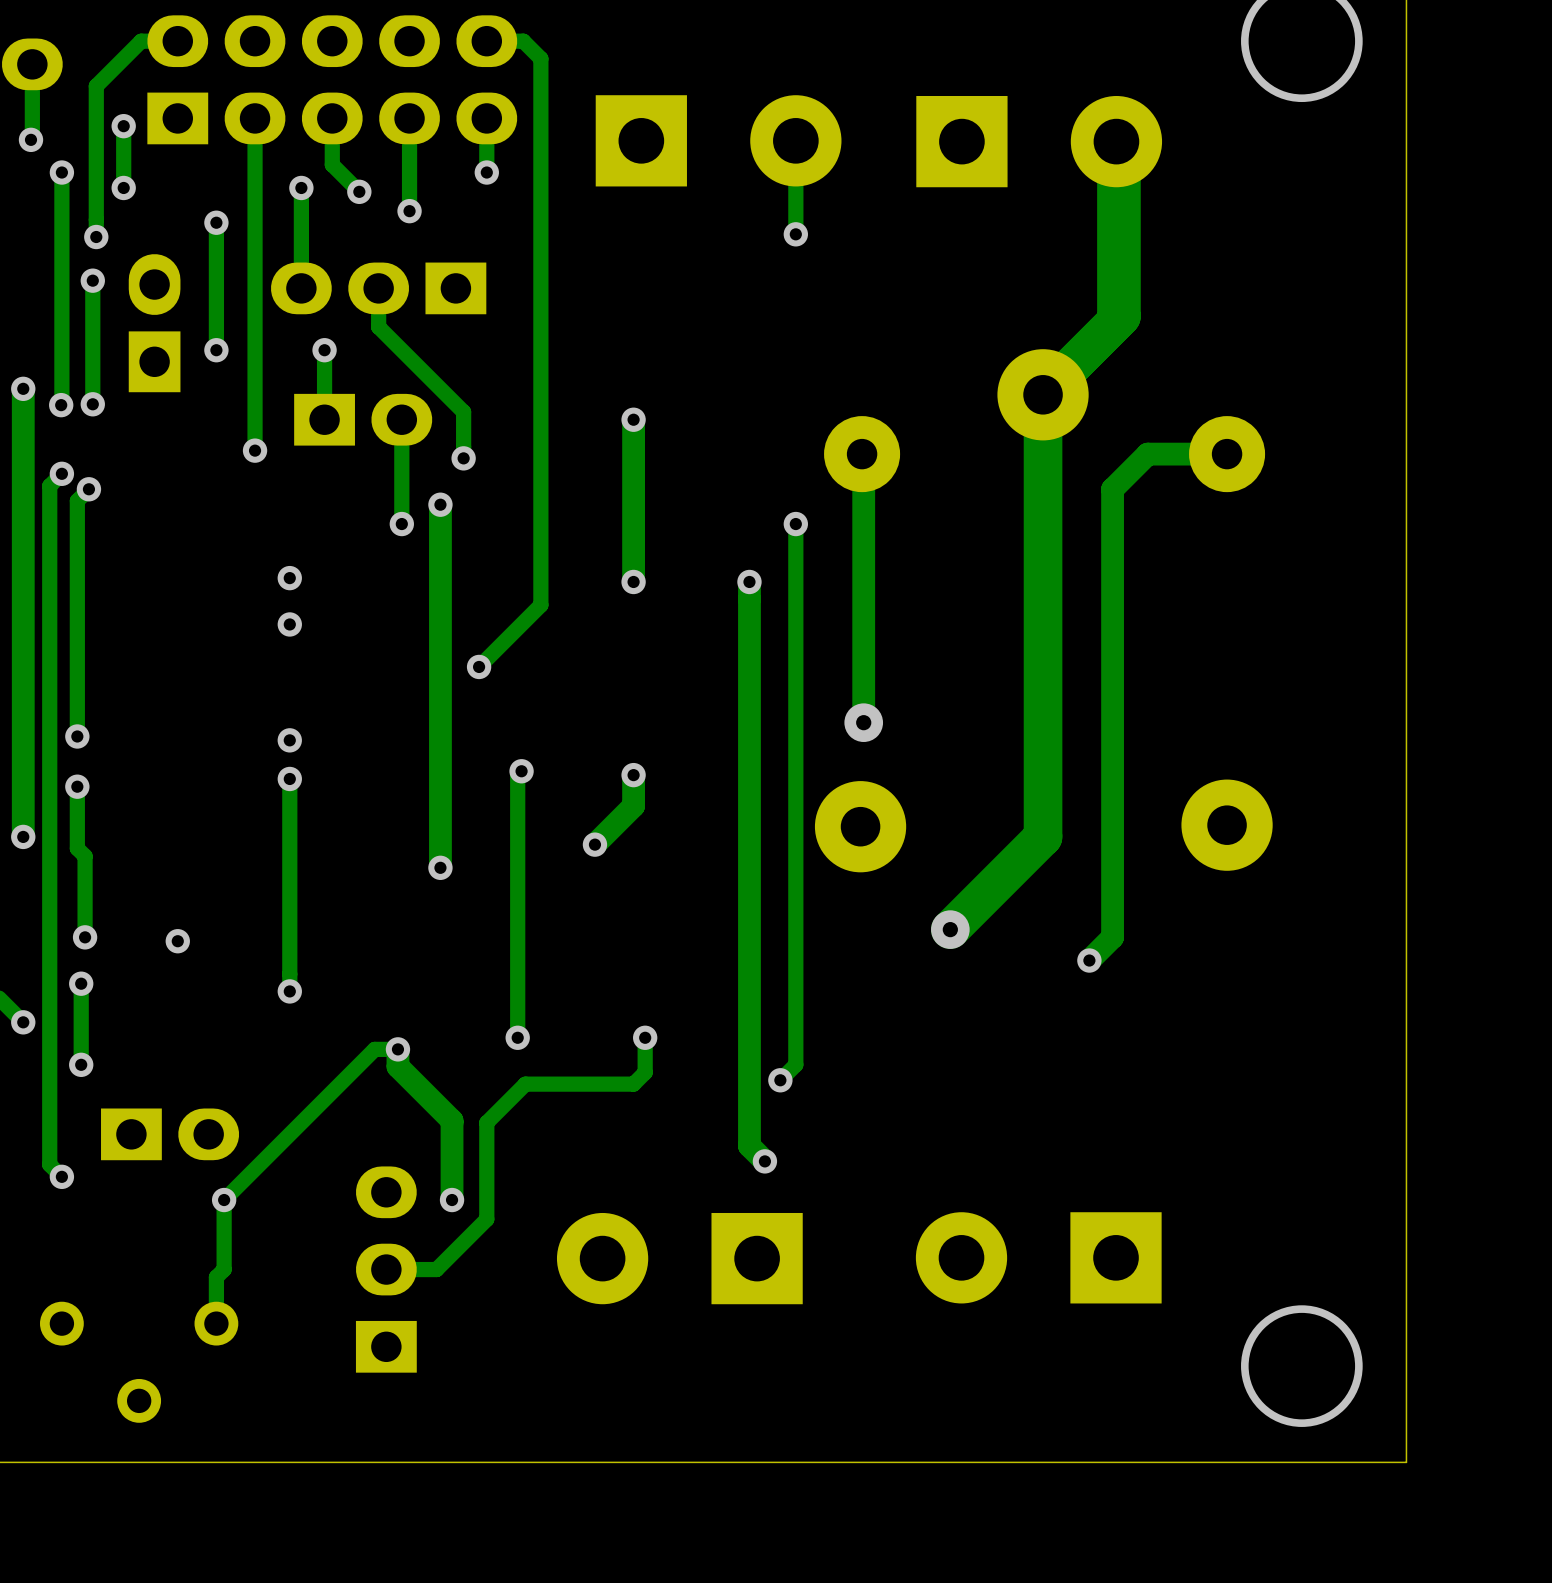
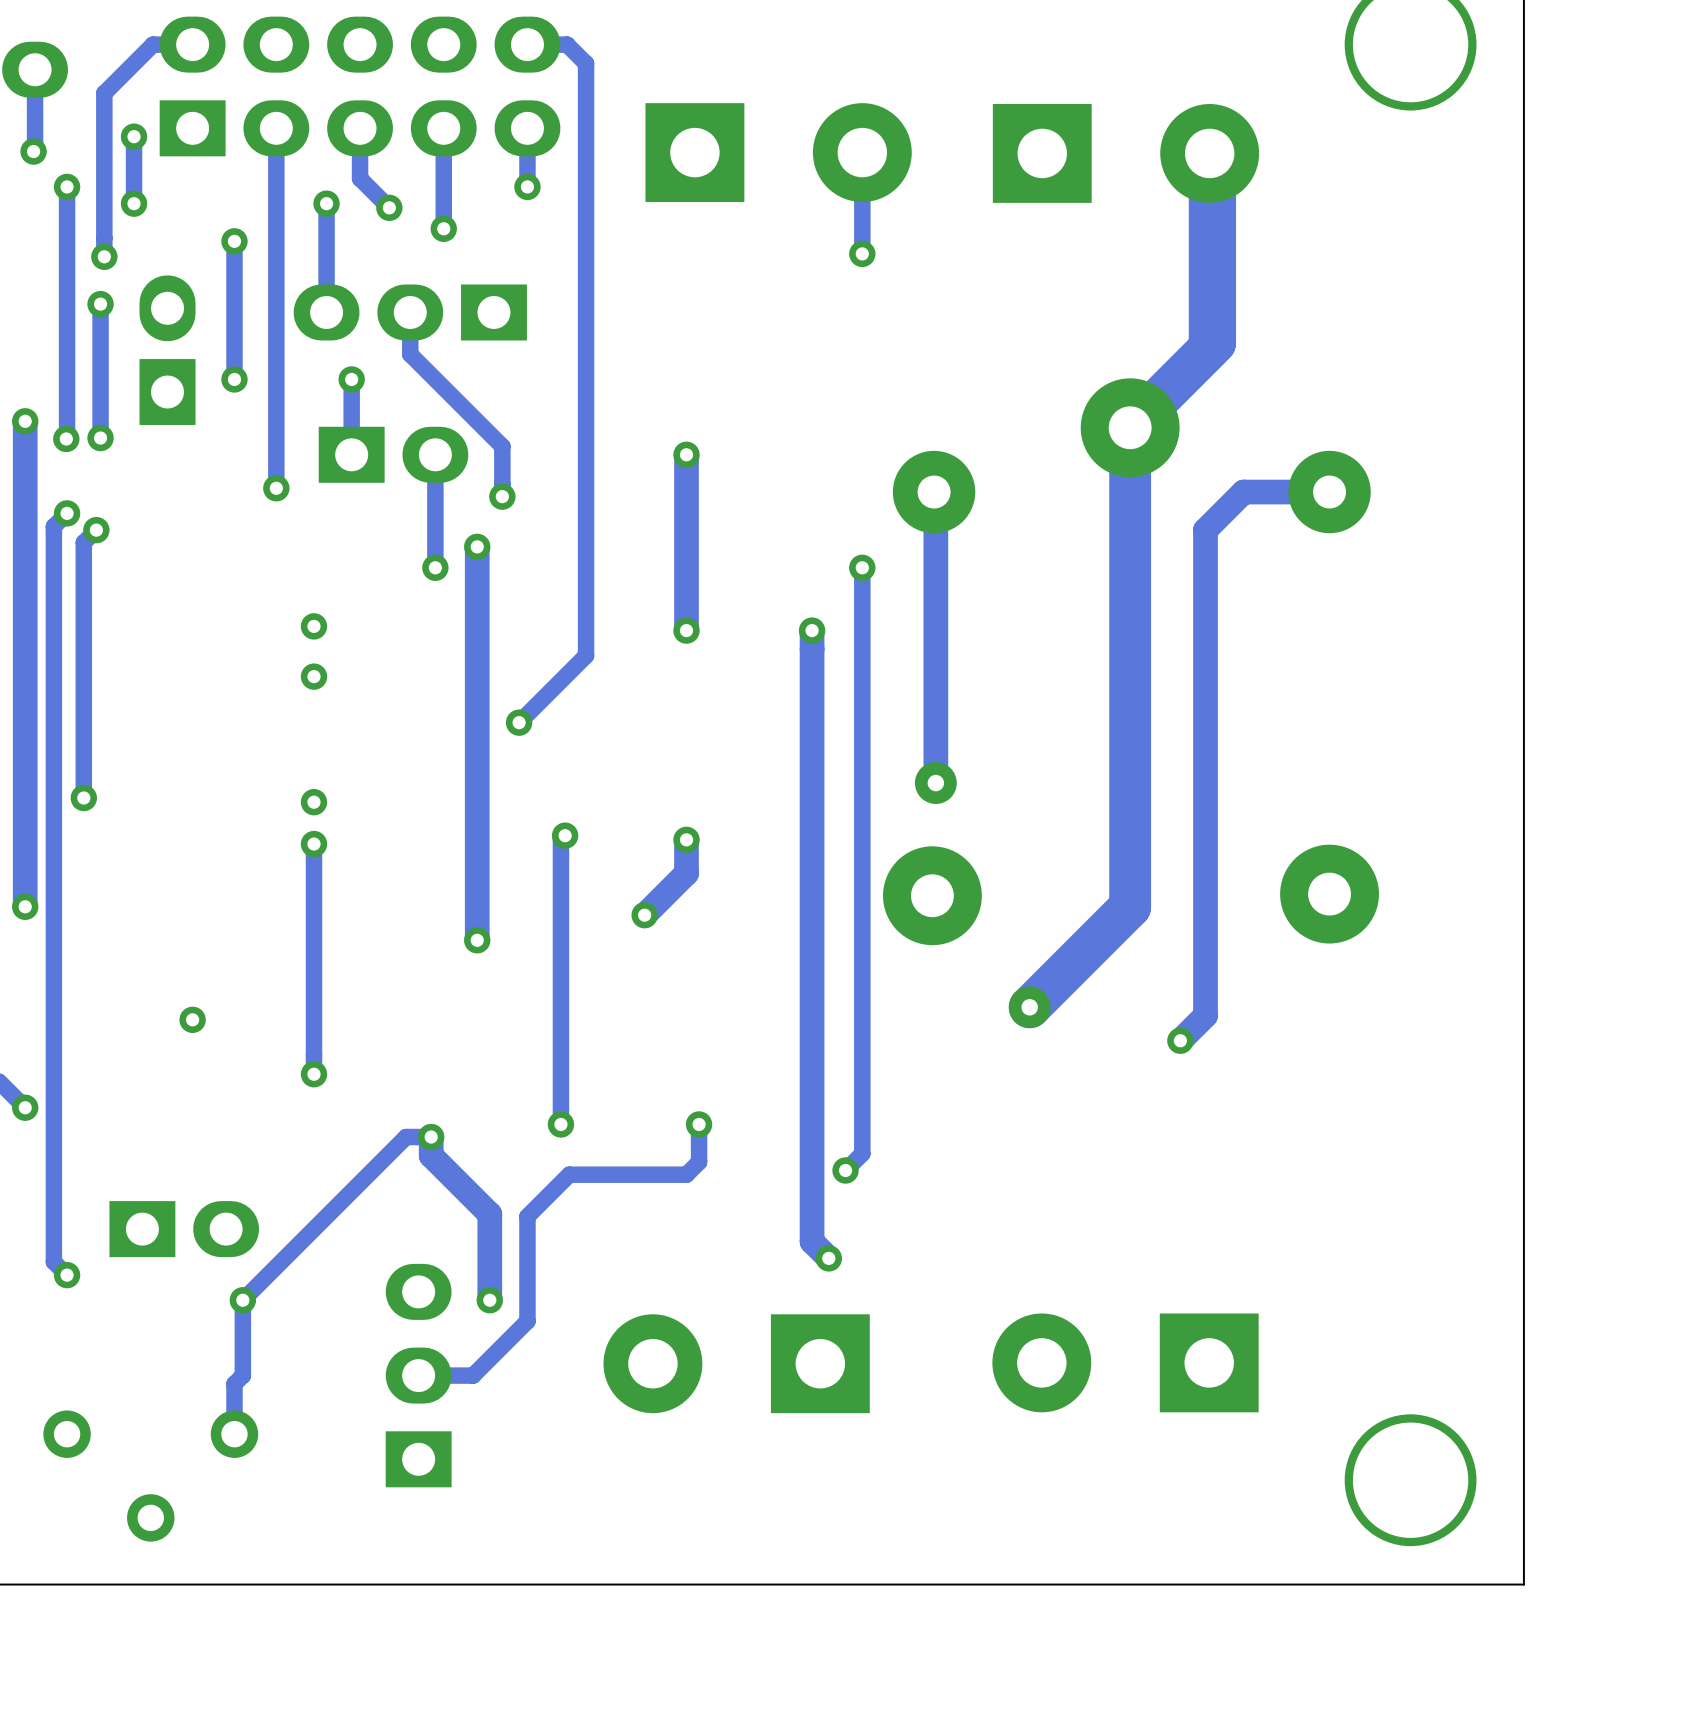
track: (77, 786) (77, 848) (85, 856) (85, 937) -> none
via: (77, 786) -> none
via: (85, 937) -> none
track: (81, 983) (81, 1064) -> none
via: (81, 983) -> none
via: (81, 1064) -> none

